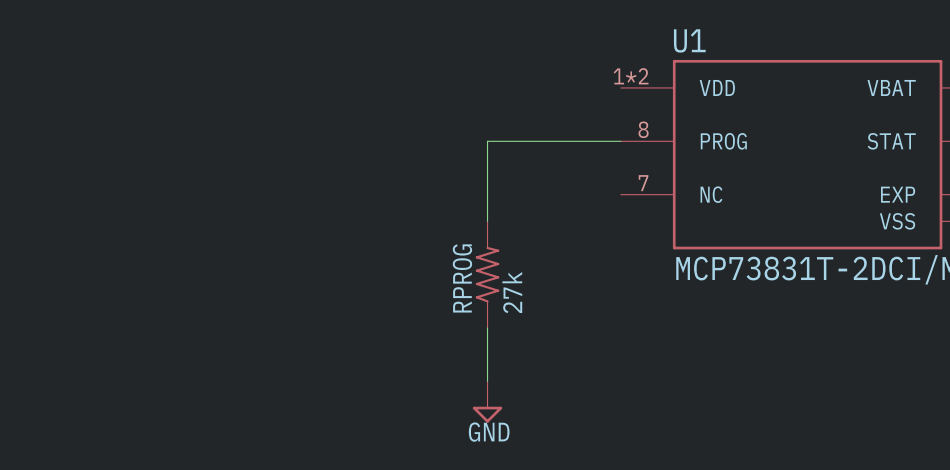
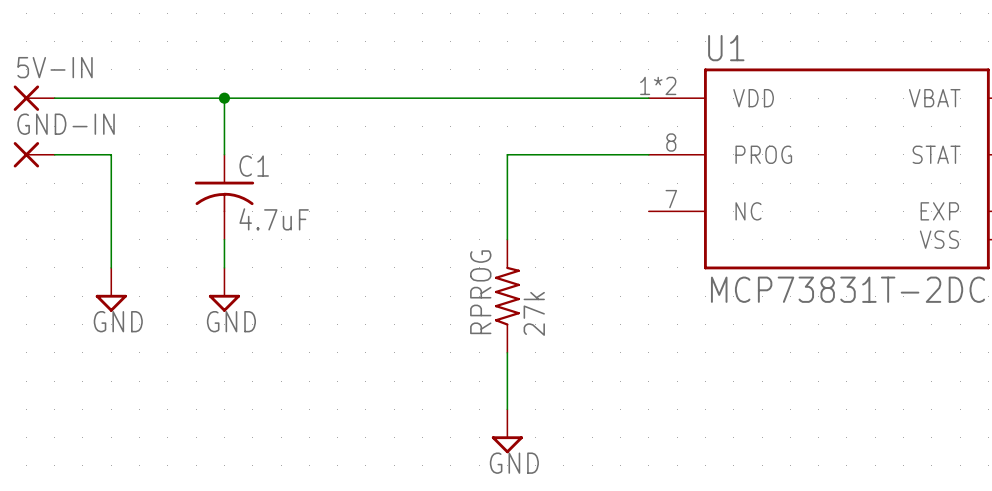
5V-IN: none -> (34, 98)
wire: none -> (54, 98) (648, 98)
wire: none -> (224, 98) (224, 154)
junction: none -> (224, 98)
GND-IN: none -> (34, 154)
wire: none -> (54, 154) (111, 154) (111, 267)
C1: none -> 4.7uF (224, 197)
wire: none -> (224, 239) (224, 267)
power symbol: none -> GND (111, 289)
power symbol: none -> GND (224, 289)

